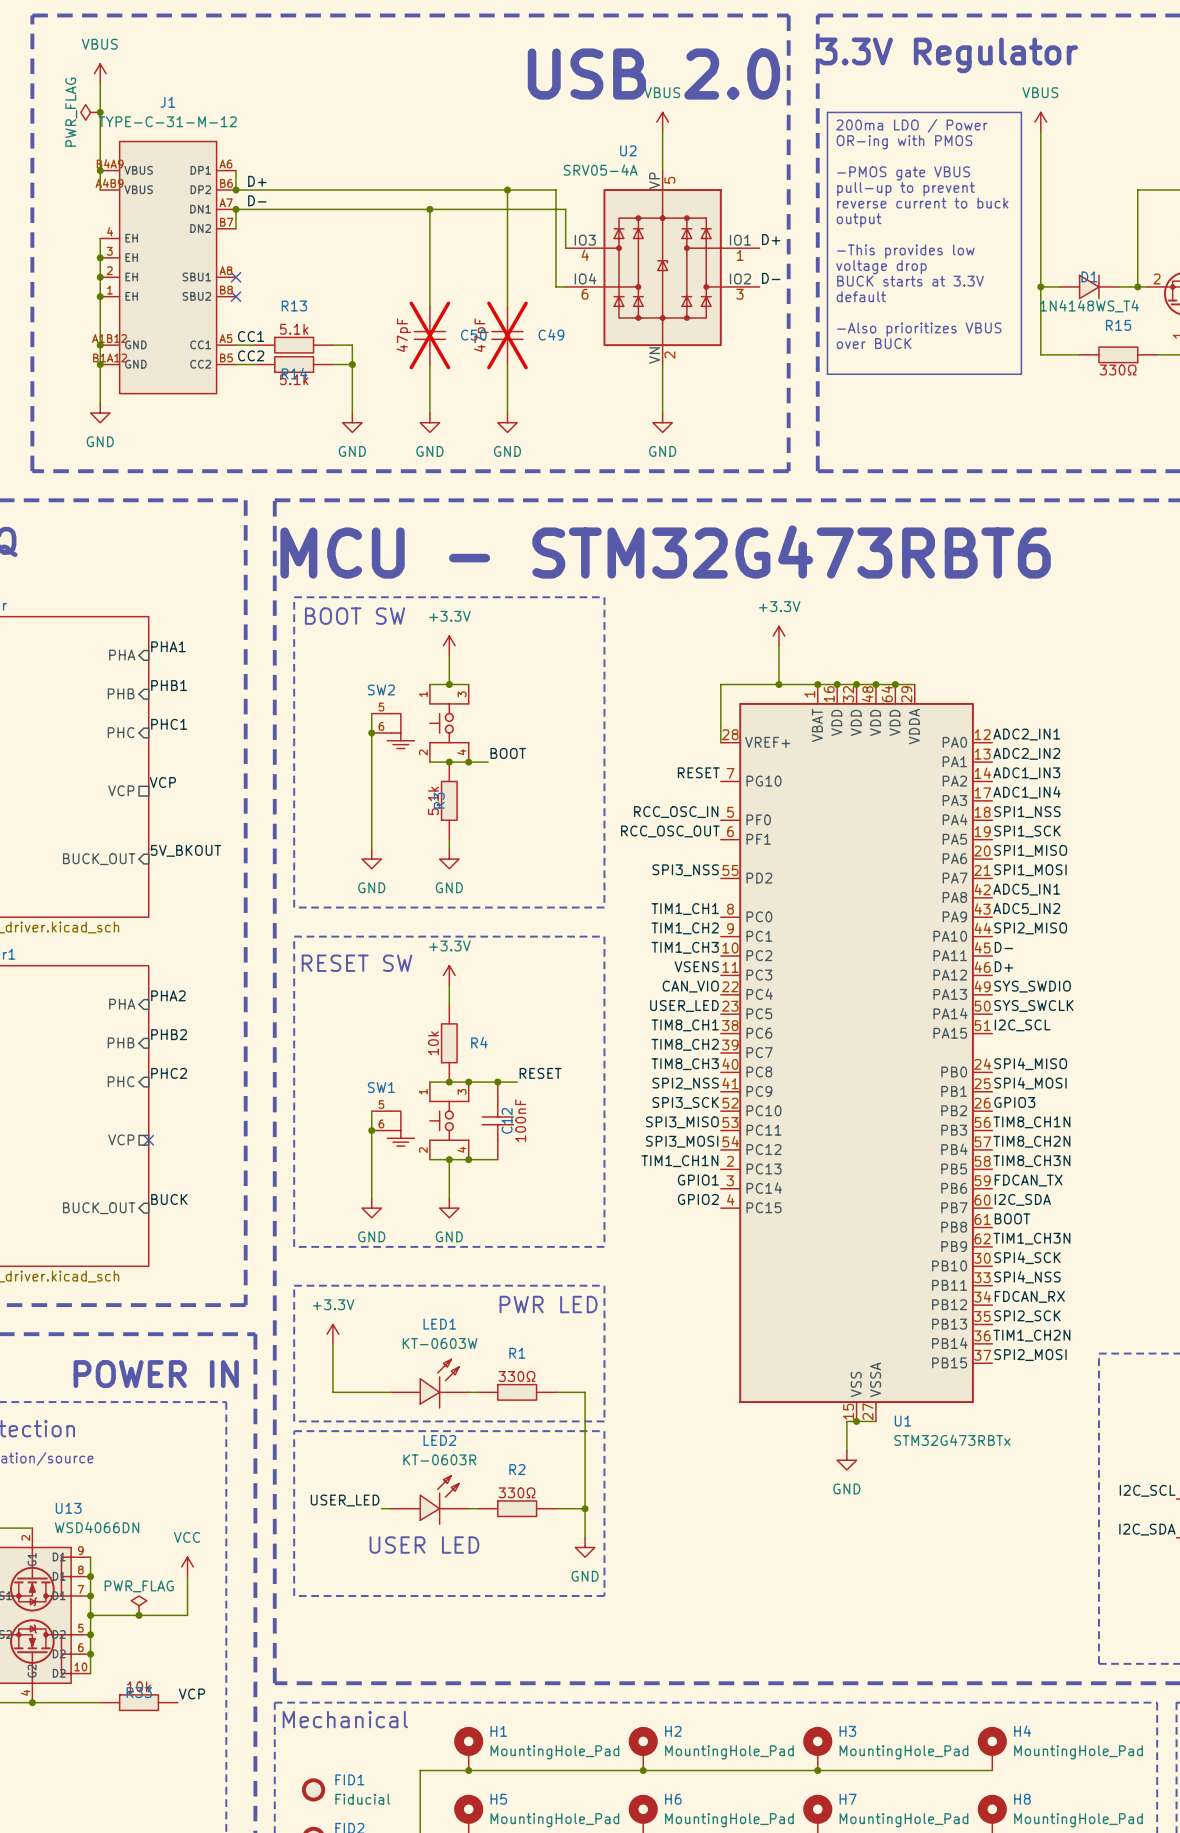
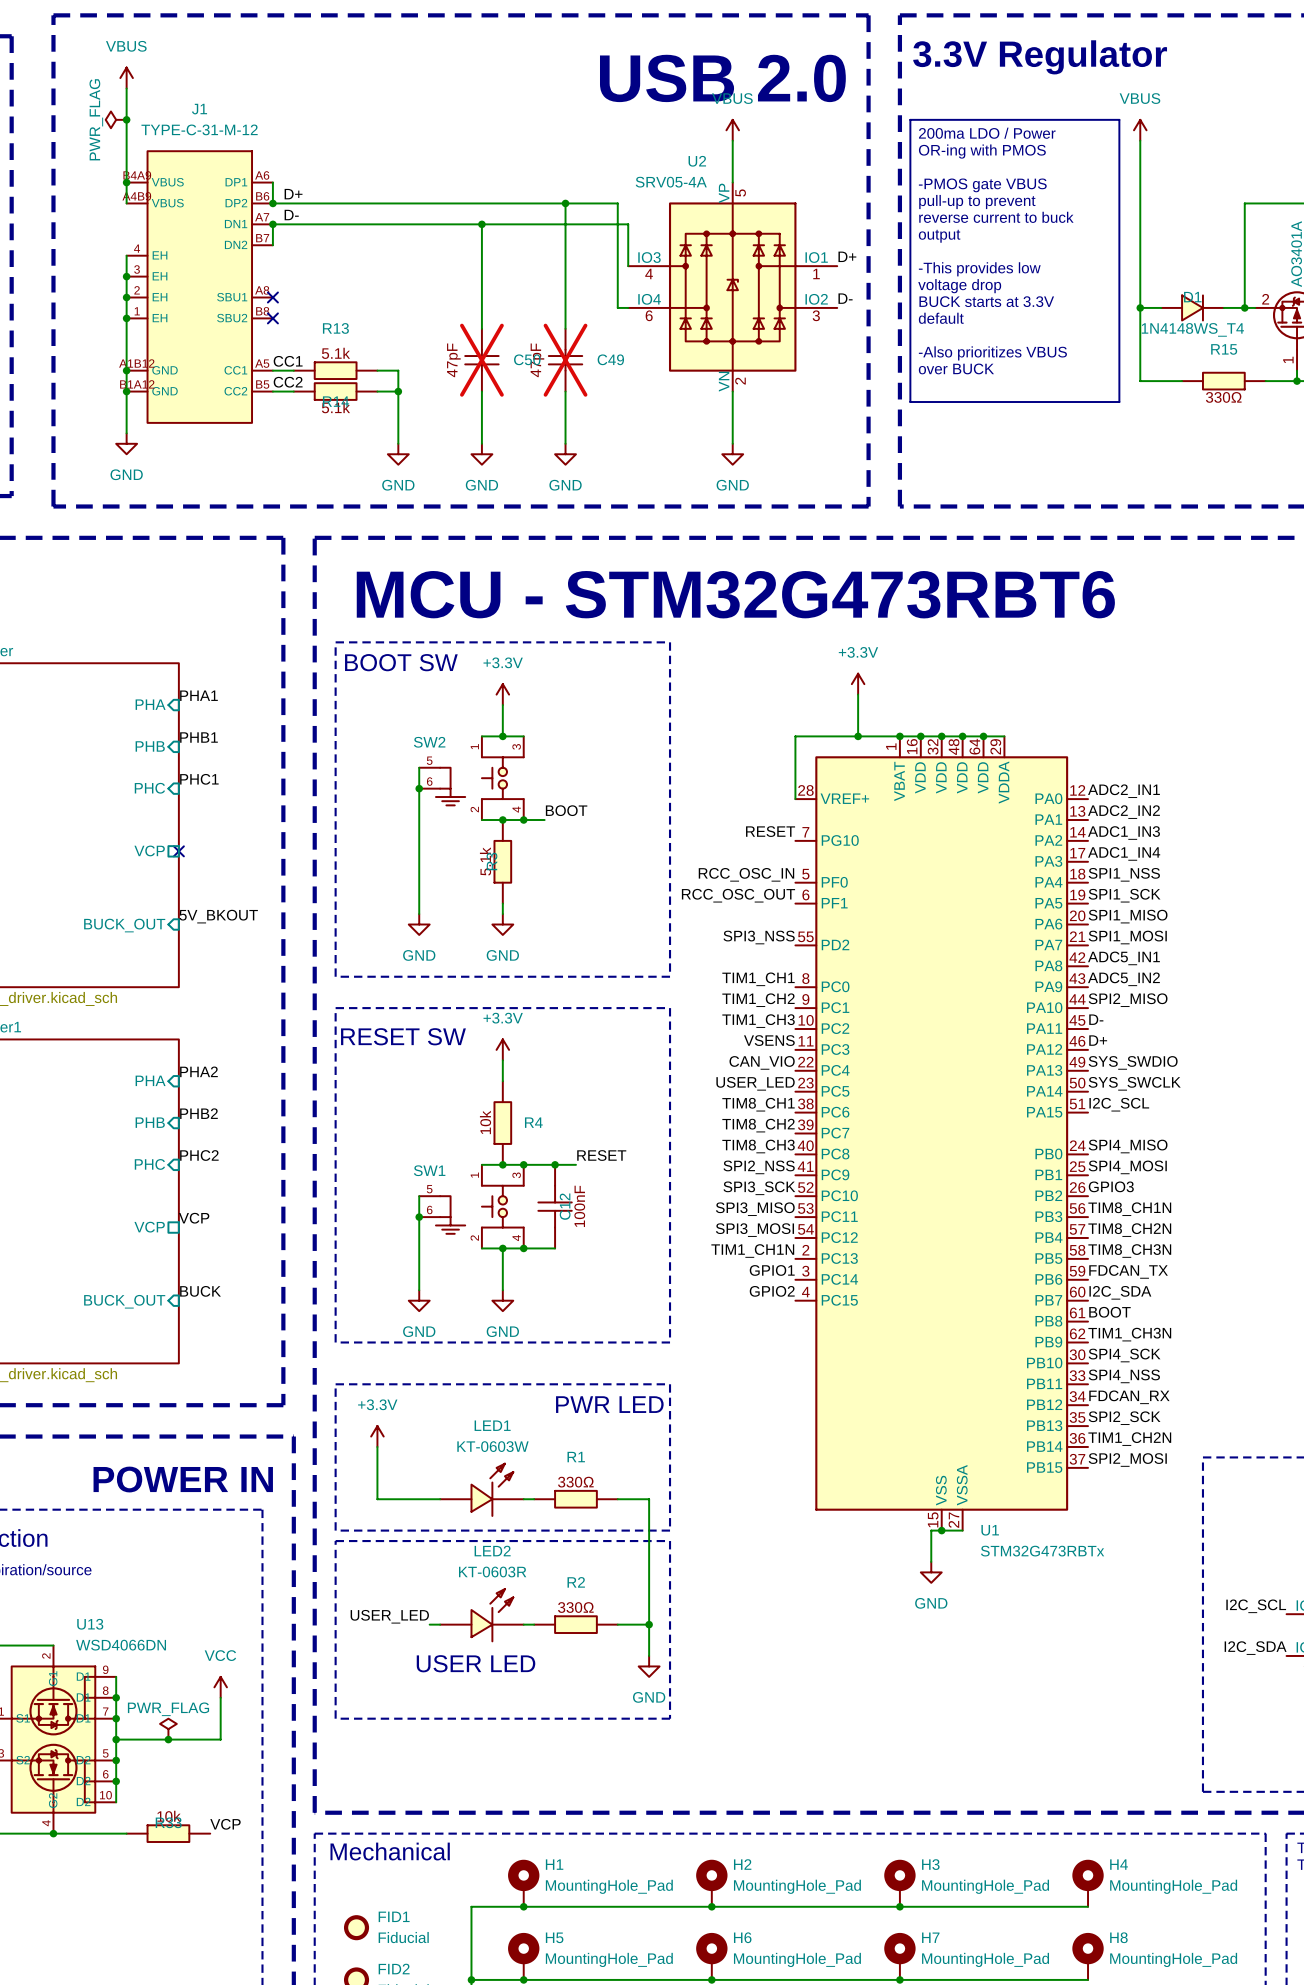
label: VCP (162, 782) -> none
no-connect mark: none -> (178, 851)
label: none -> VCP (194, 1218)
no-connect mark: (148, 1140) -> none

